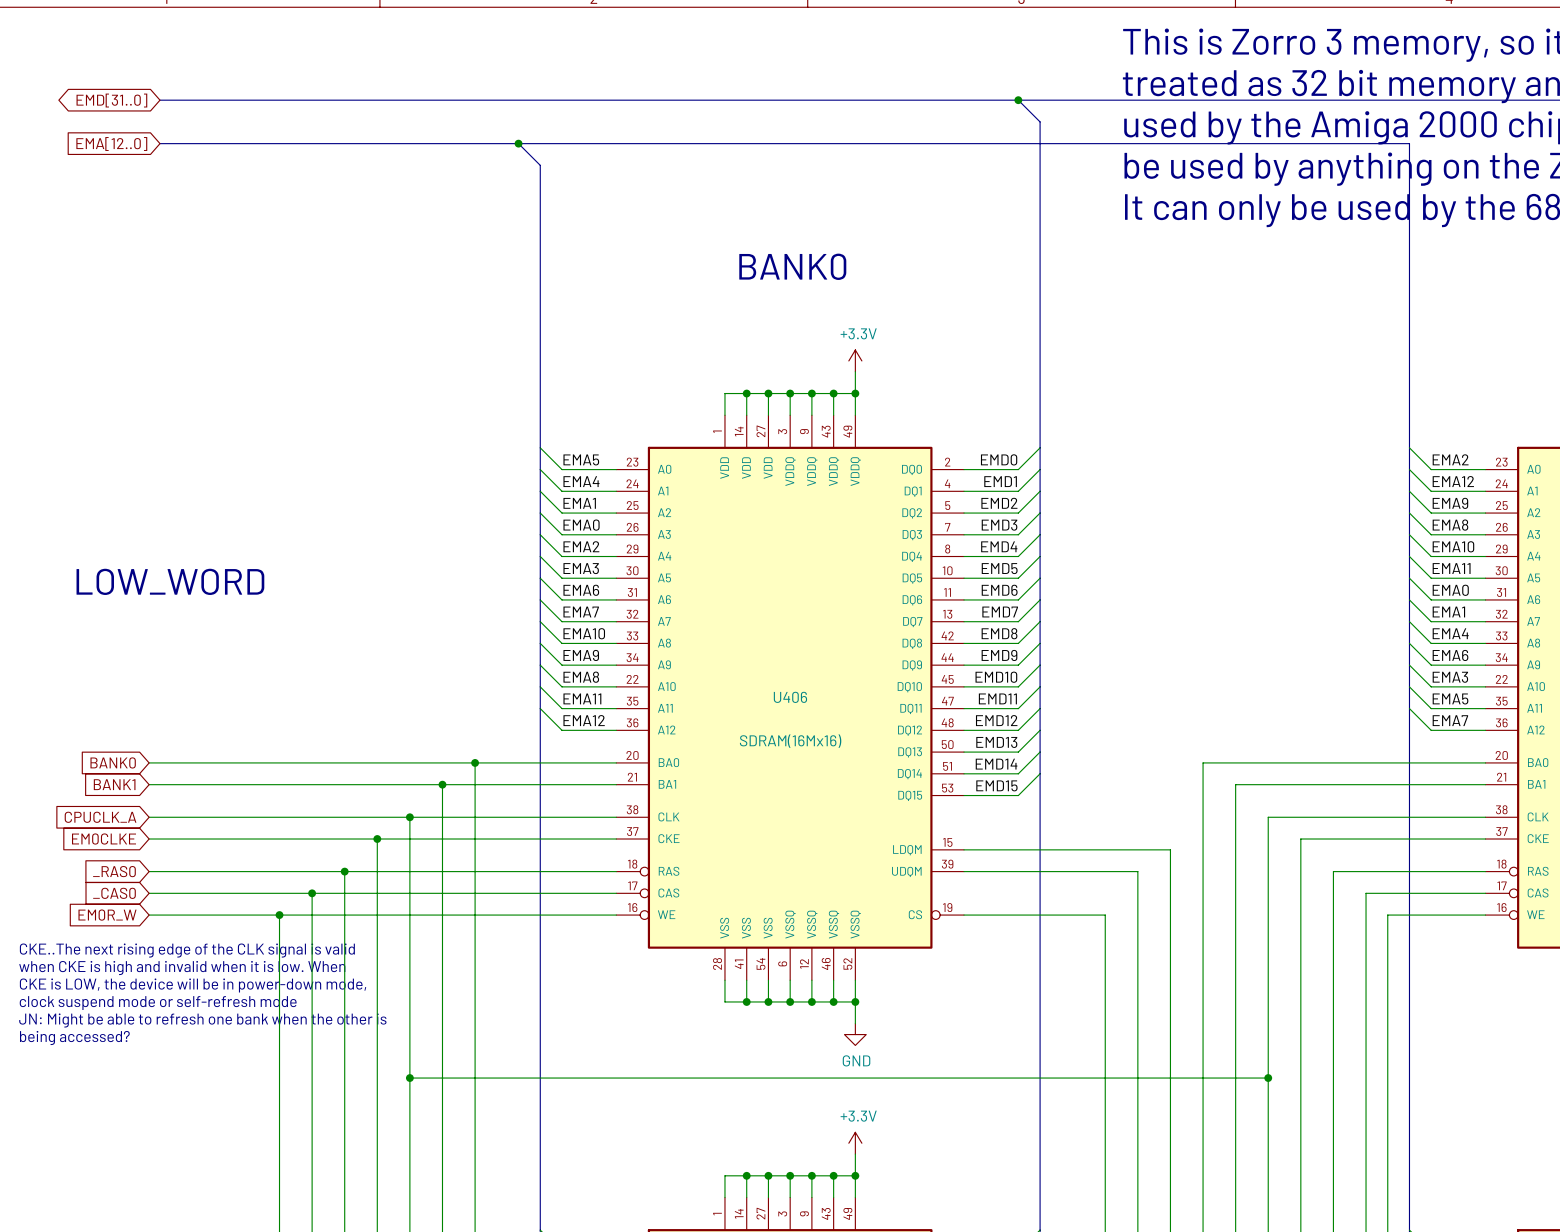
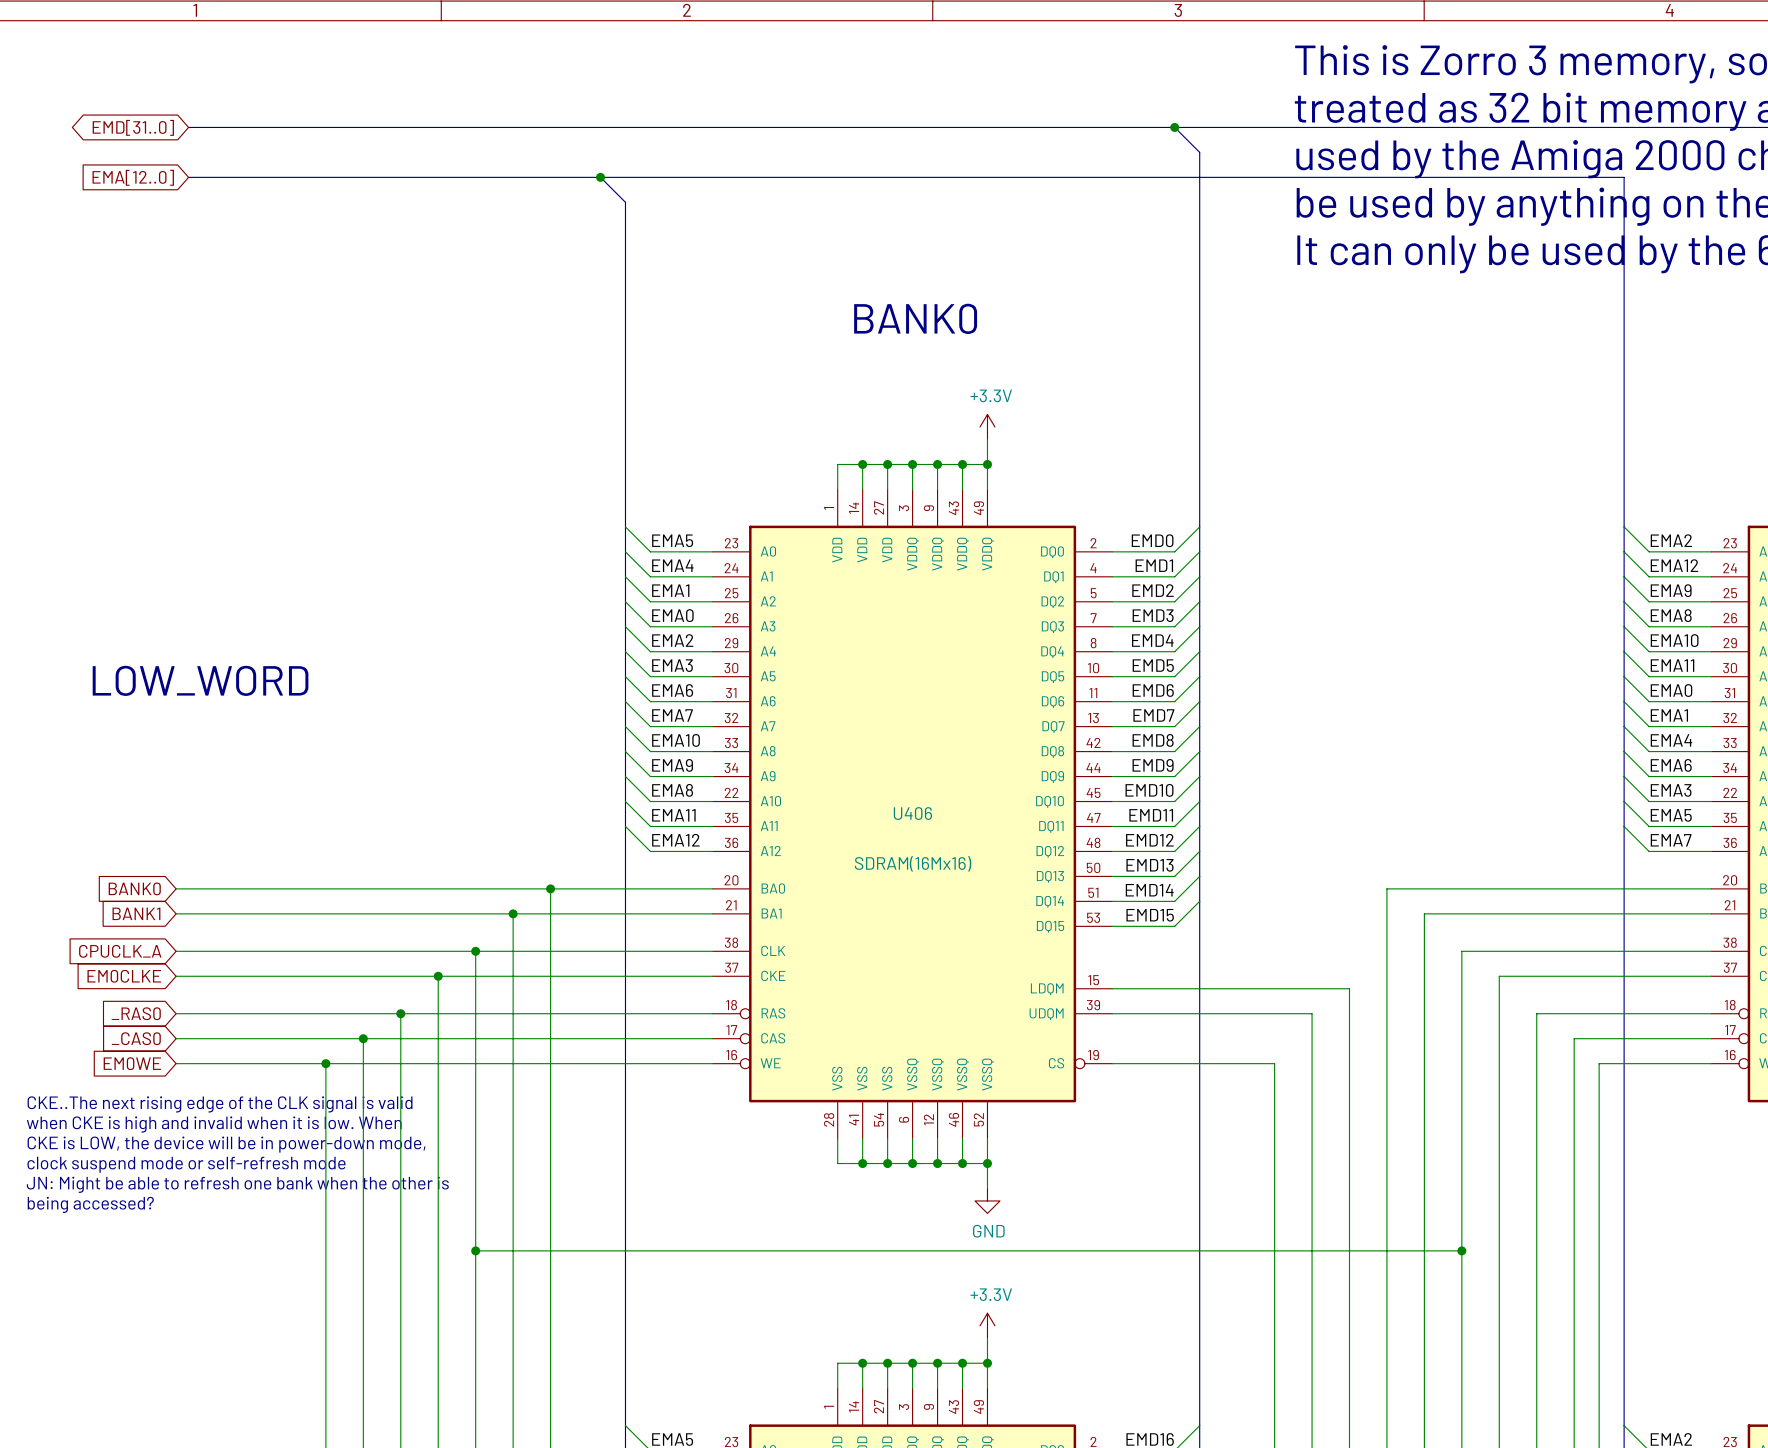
global label: EM0R_W (107, 915) -> EM0WE (132, 1063)

